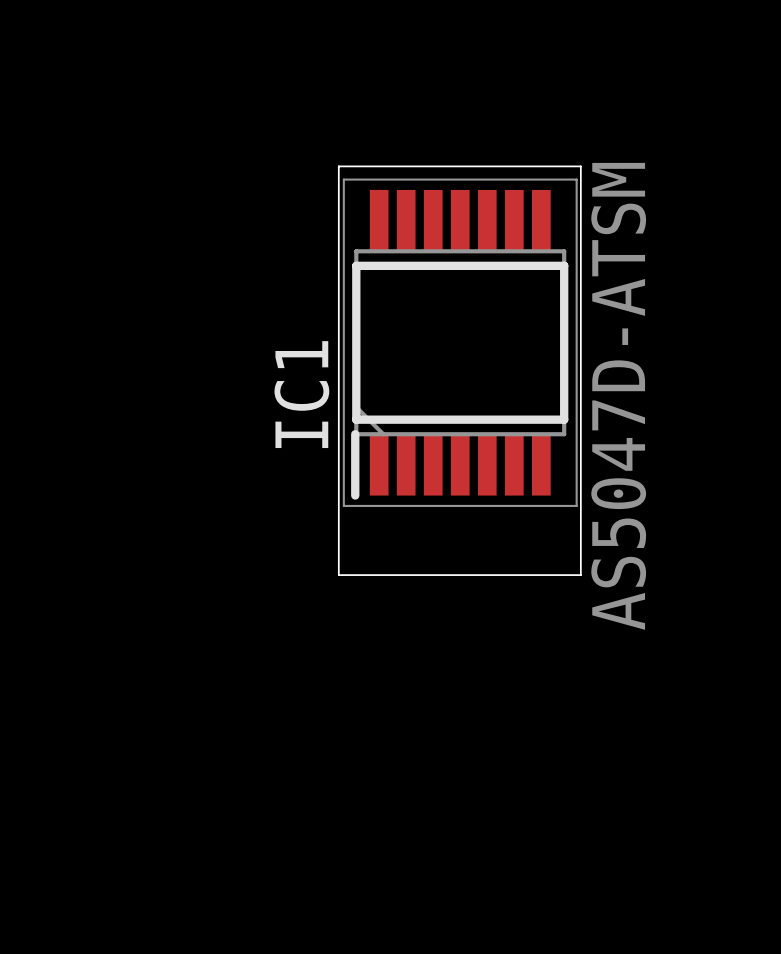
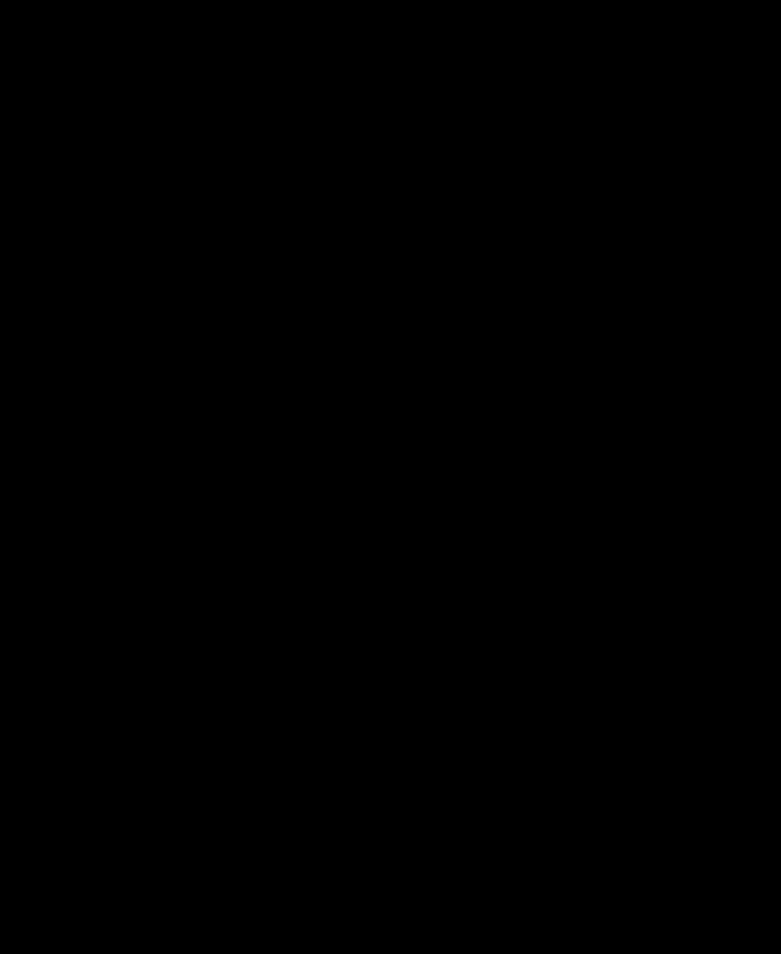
board edge: (338, 166) (338, 575) (580, 575) (580, 166) (338, 166) -> none
IC1: AS5047D-ATSM (460, 342) -> none

